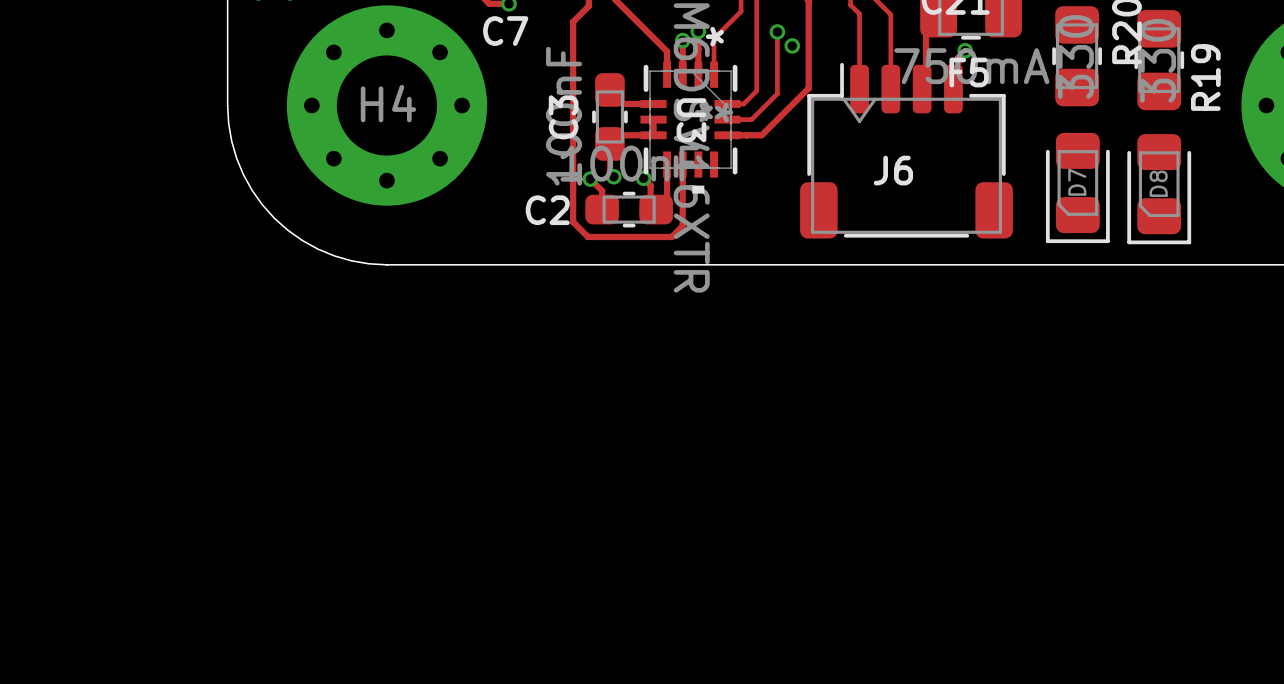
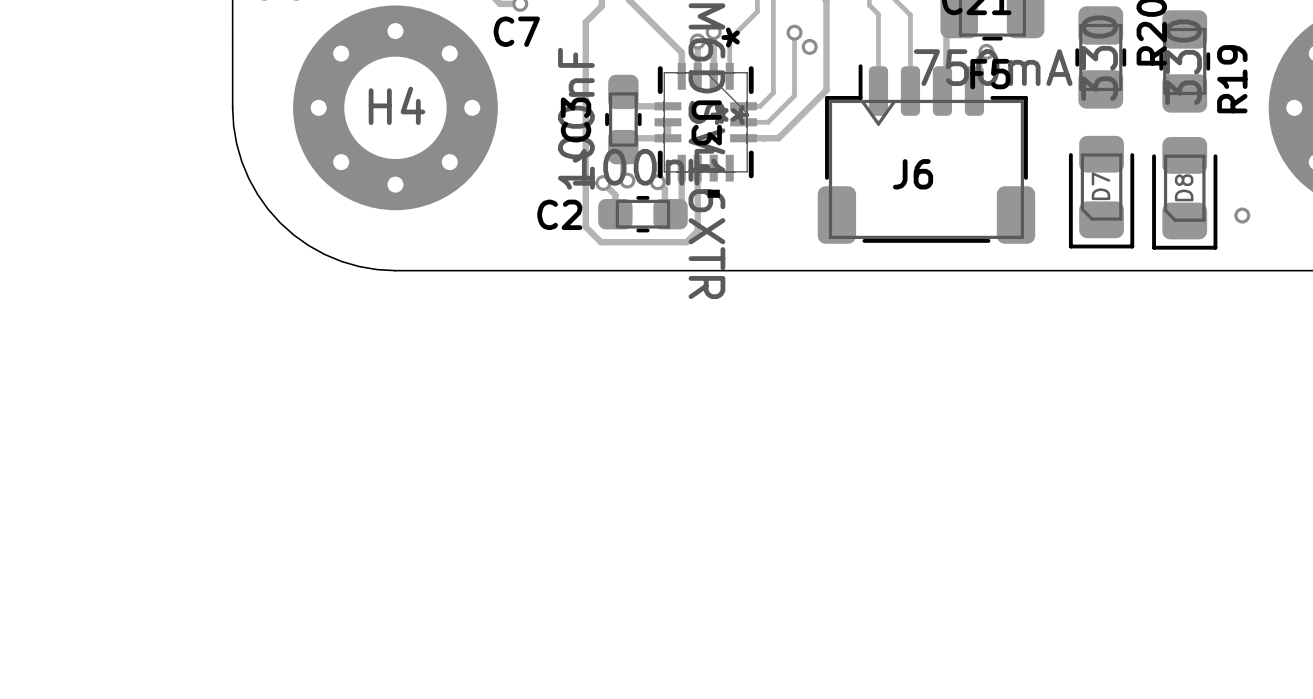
via: none -> (1242, 215)

